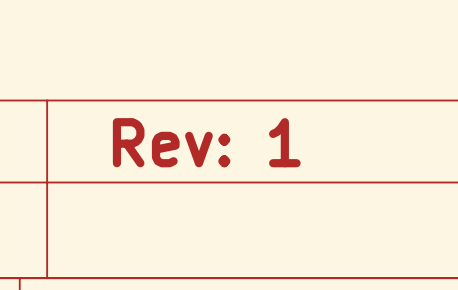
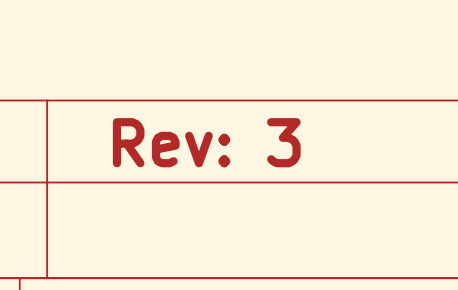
title block: Rev: 1 (206, 142) -> Rev: 3 (206, 142)

